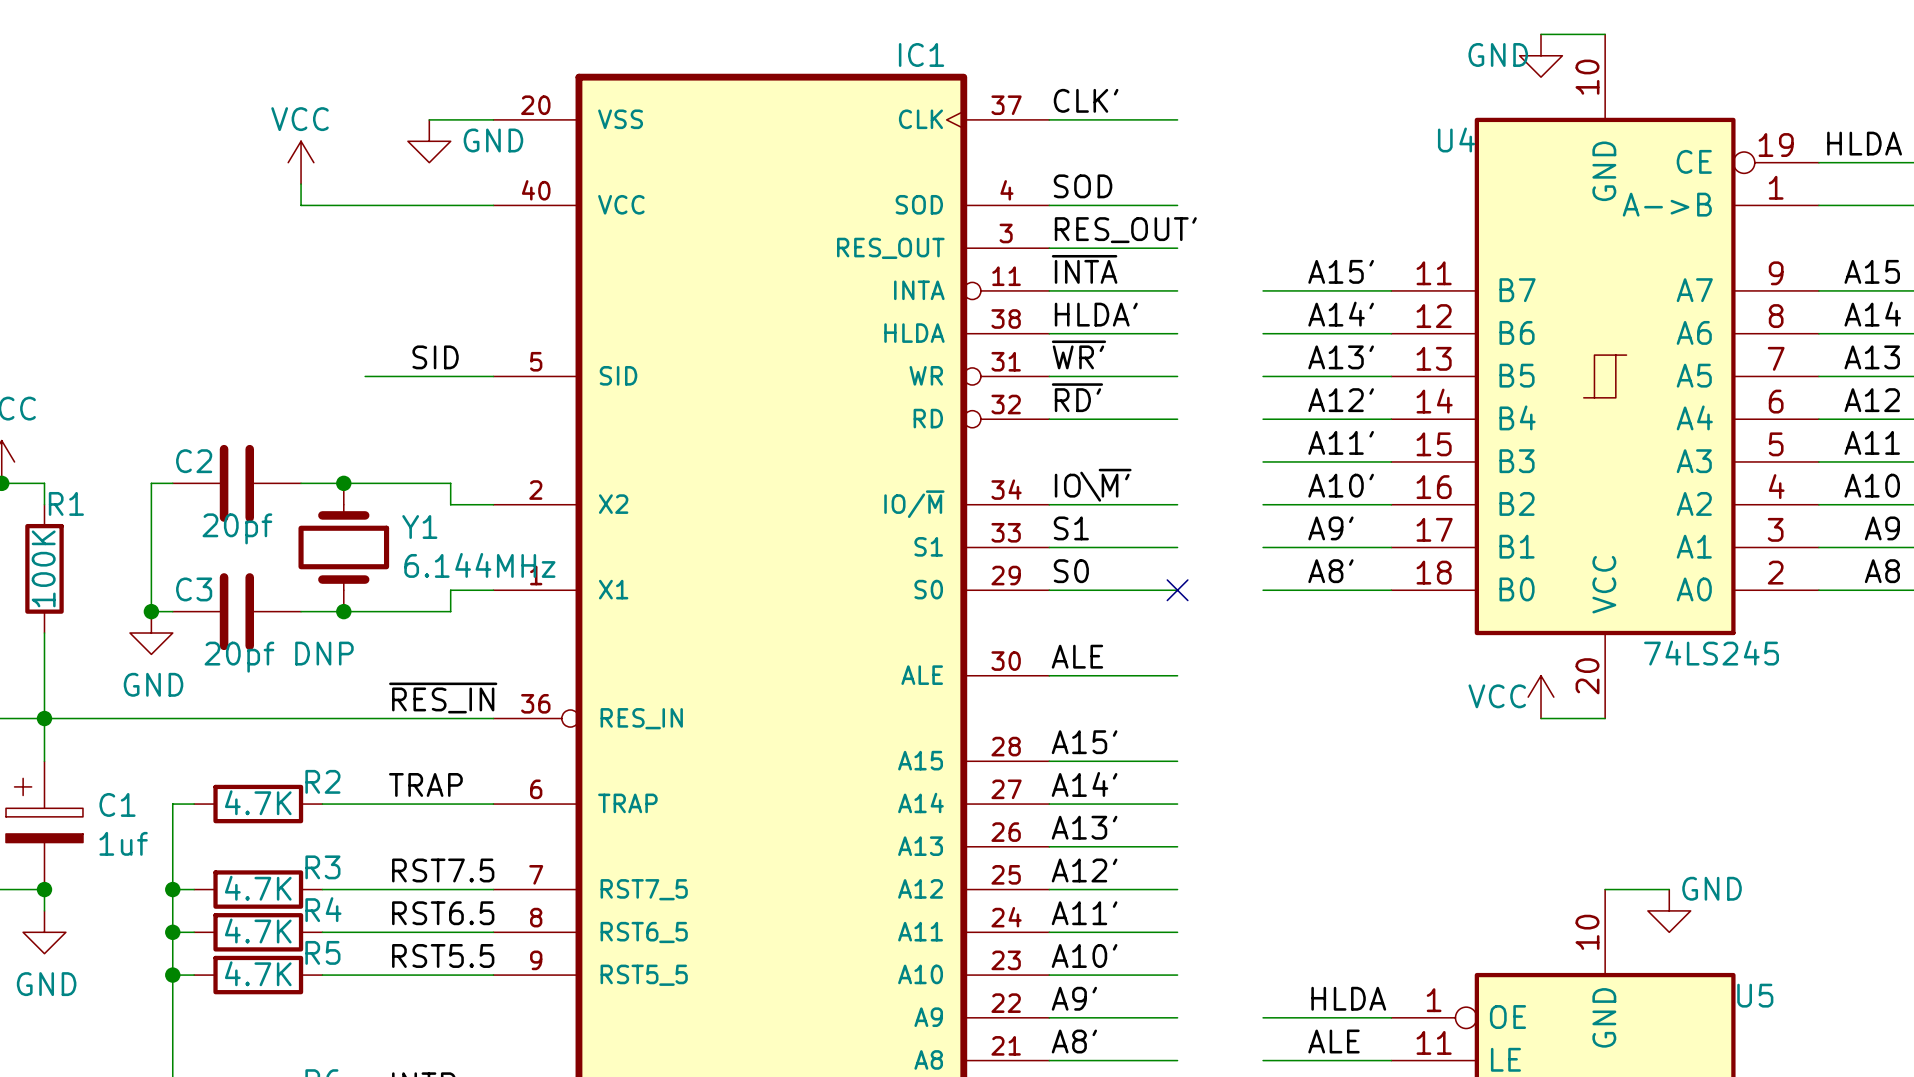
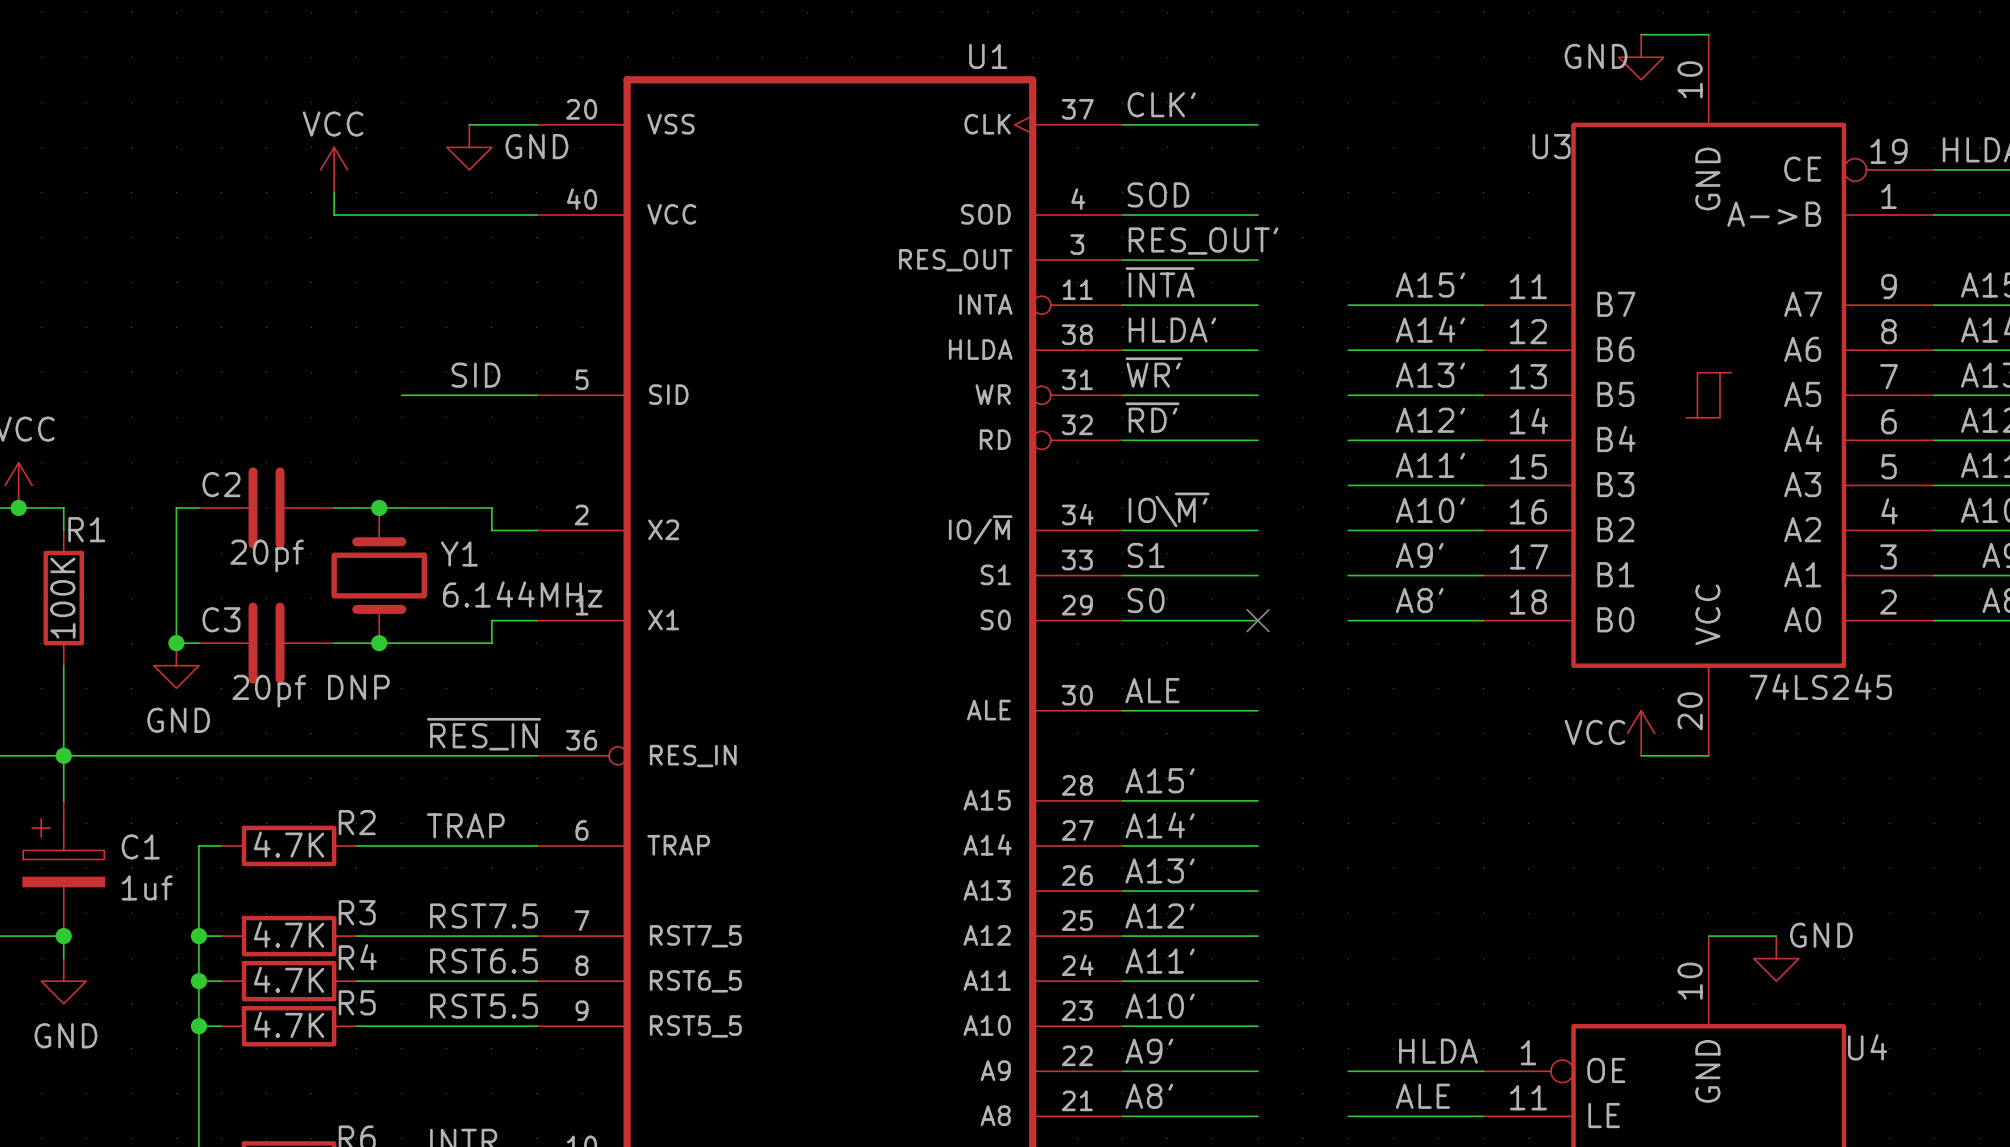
IC1 name: IC1 (921, 54) -> U1 (988, 56)
U4 name: U4 (1456, 139) -> U3 (1551, 146)
U5 name: U5 (1755, 995) -> U4 (1867, 1047)

